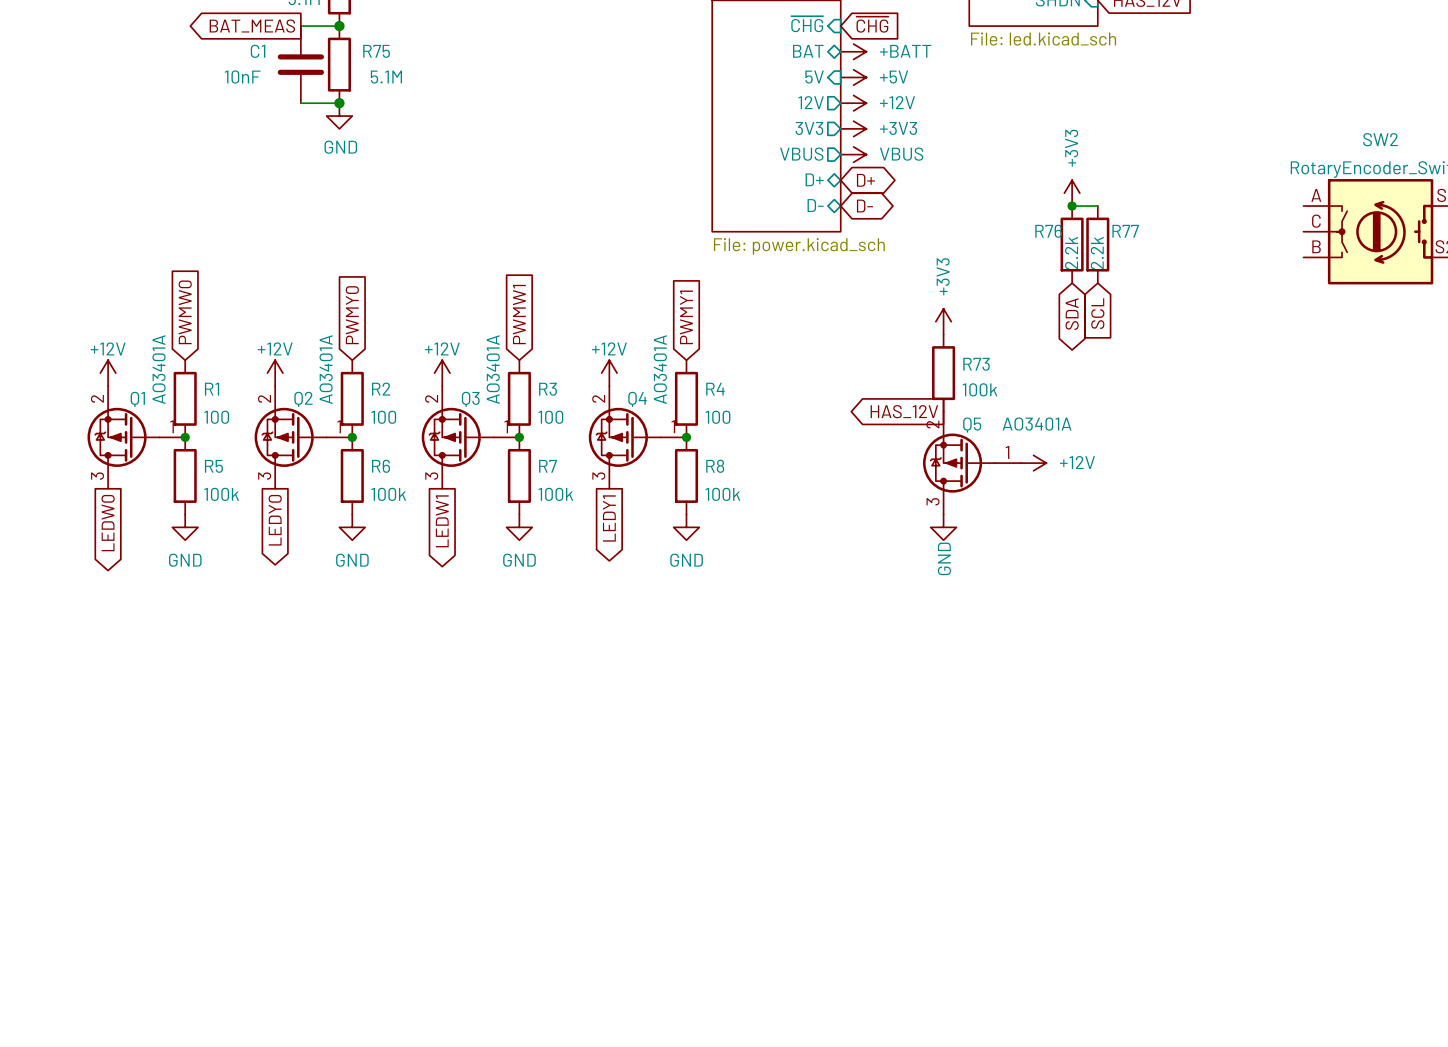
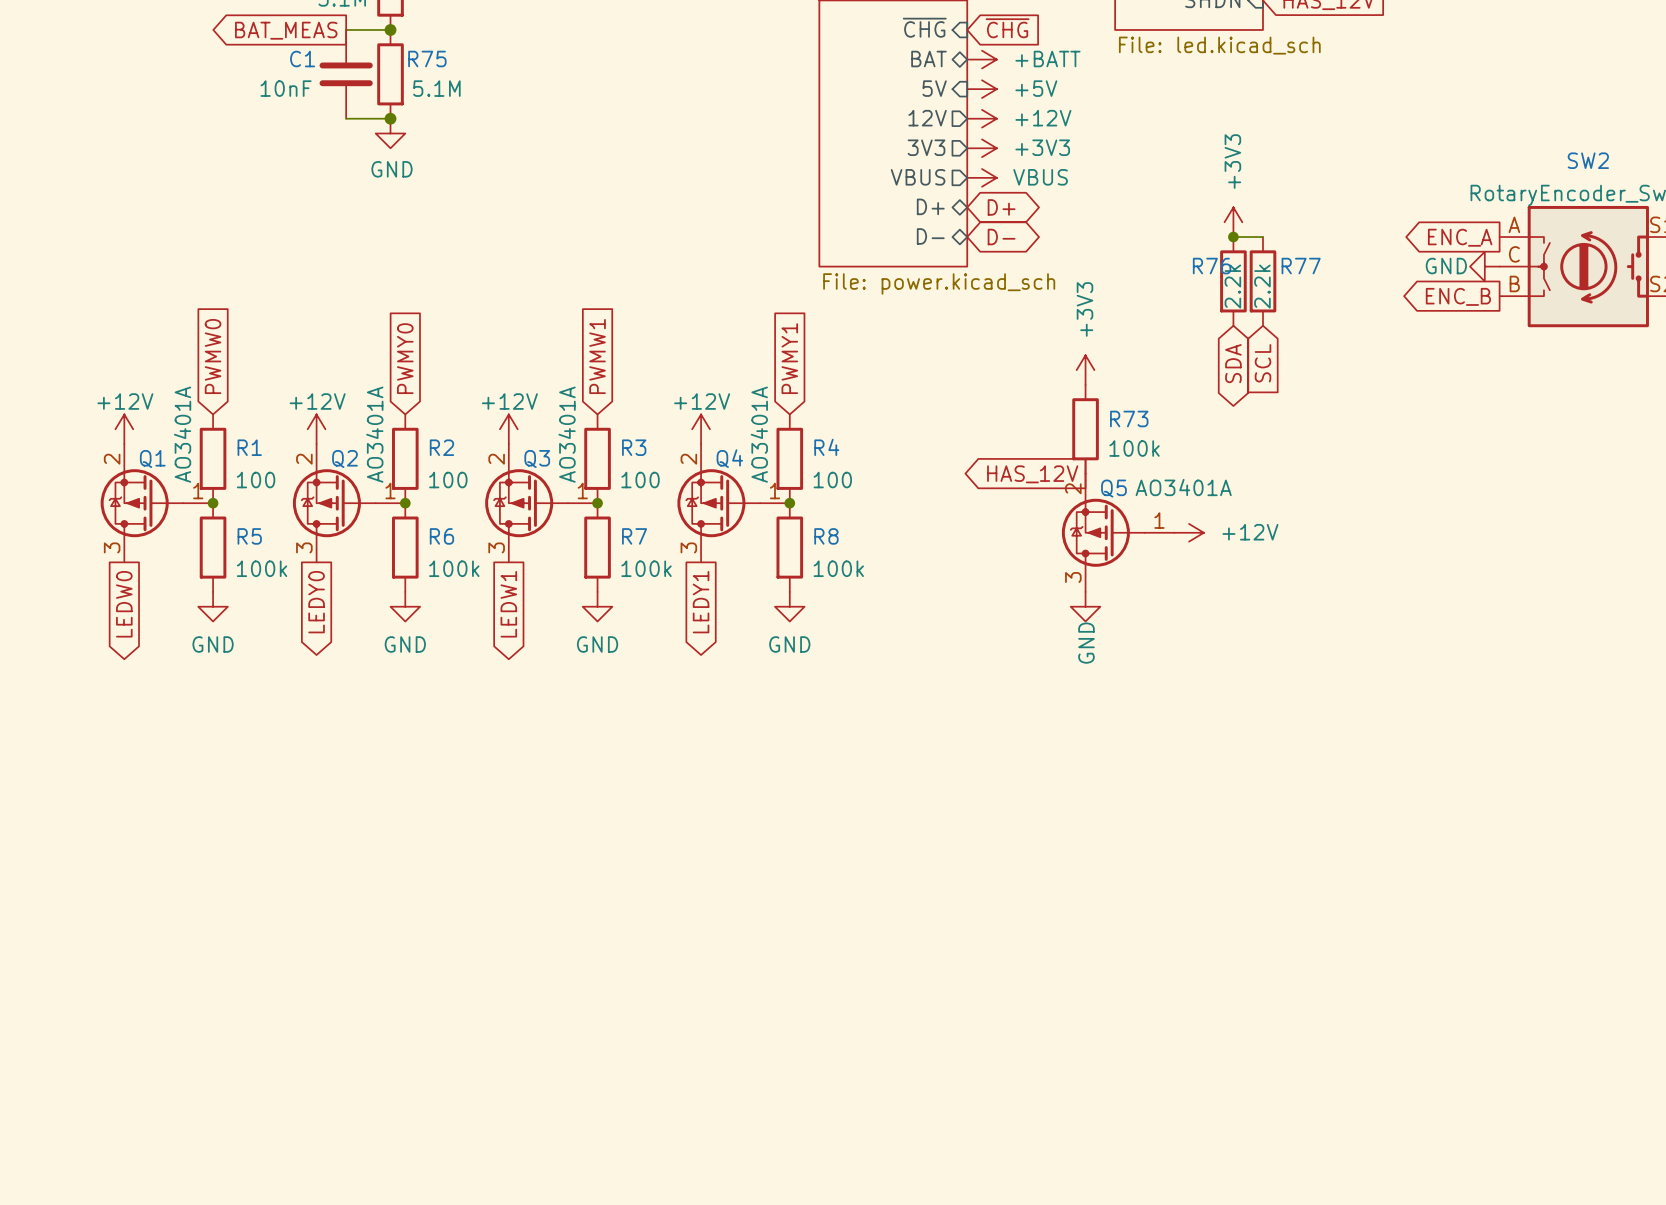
global label: none -> ENC_A (1460, 237)
power symbol: none -> GND (1484, 266)
global label: none -> ENC_B (1458, 296)

